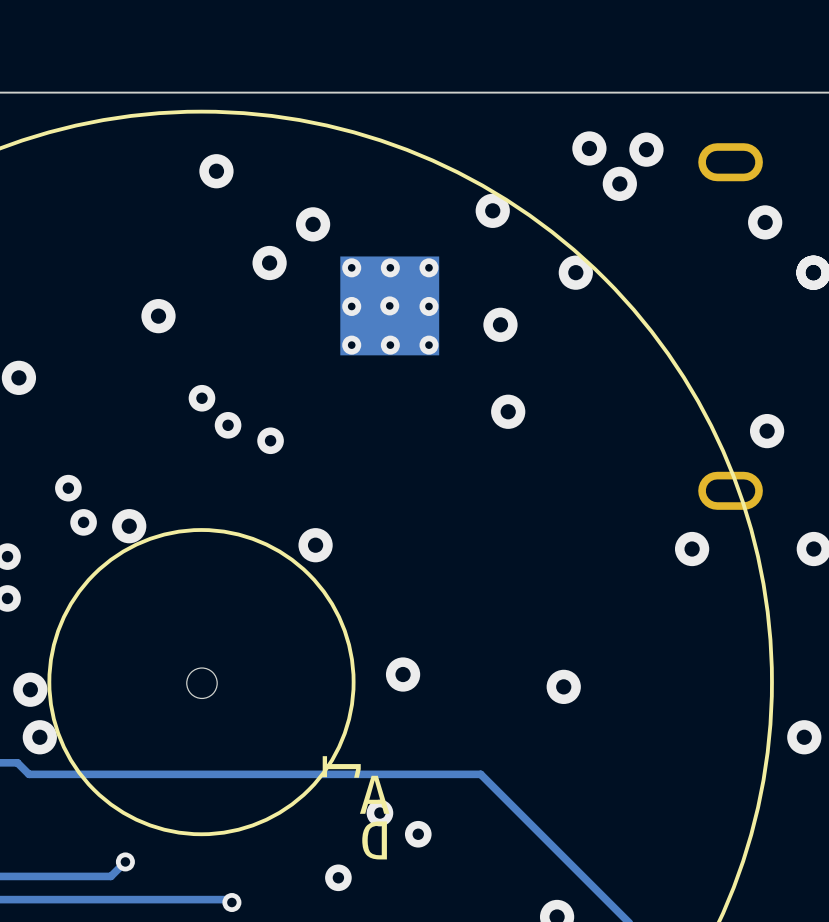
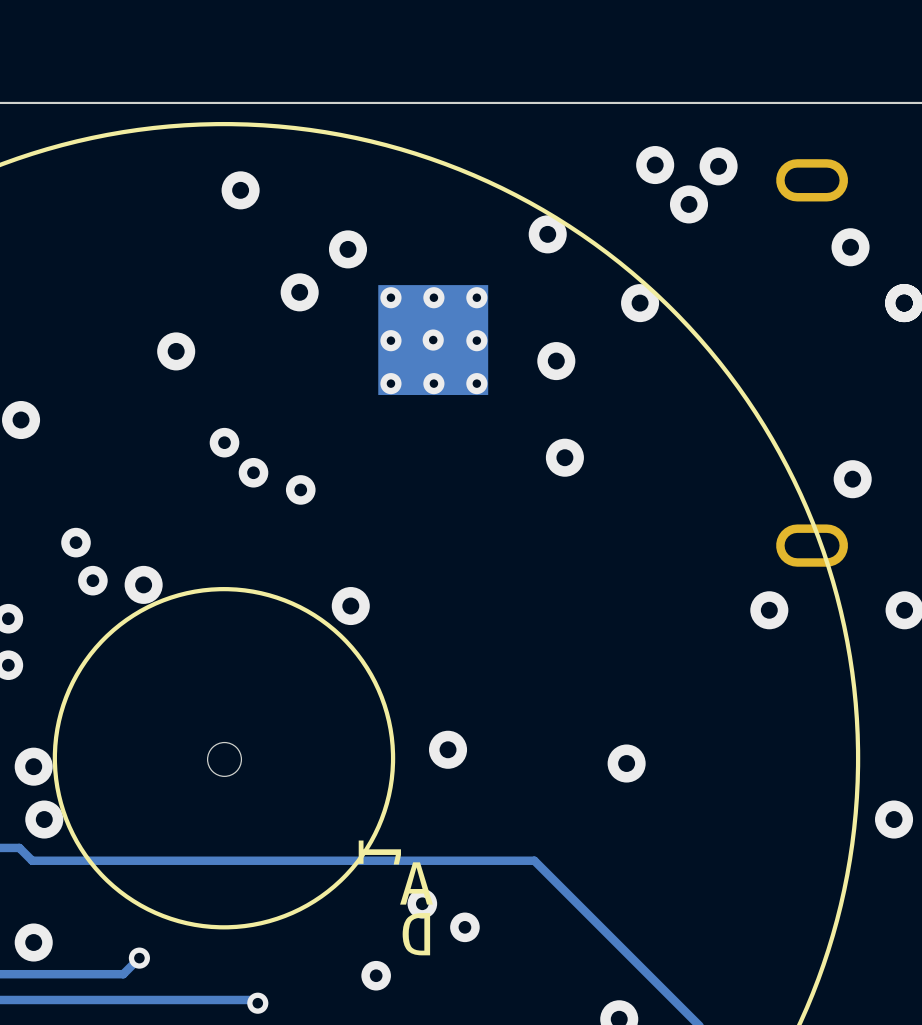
via: none -> (33, 942)

